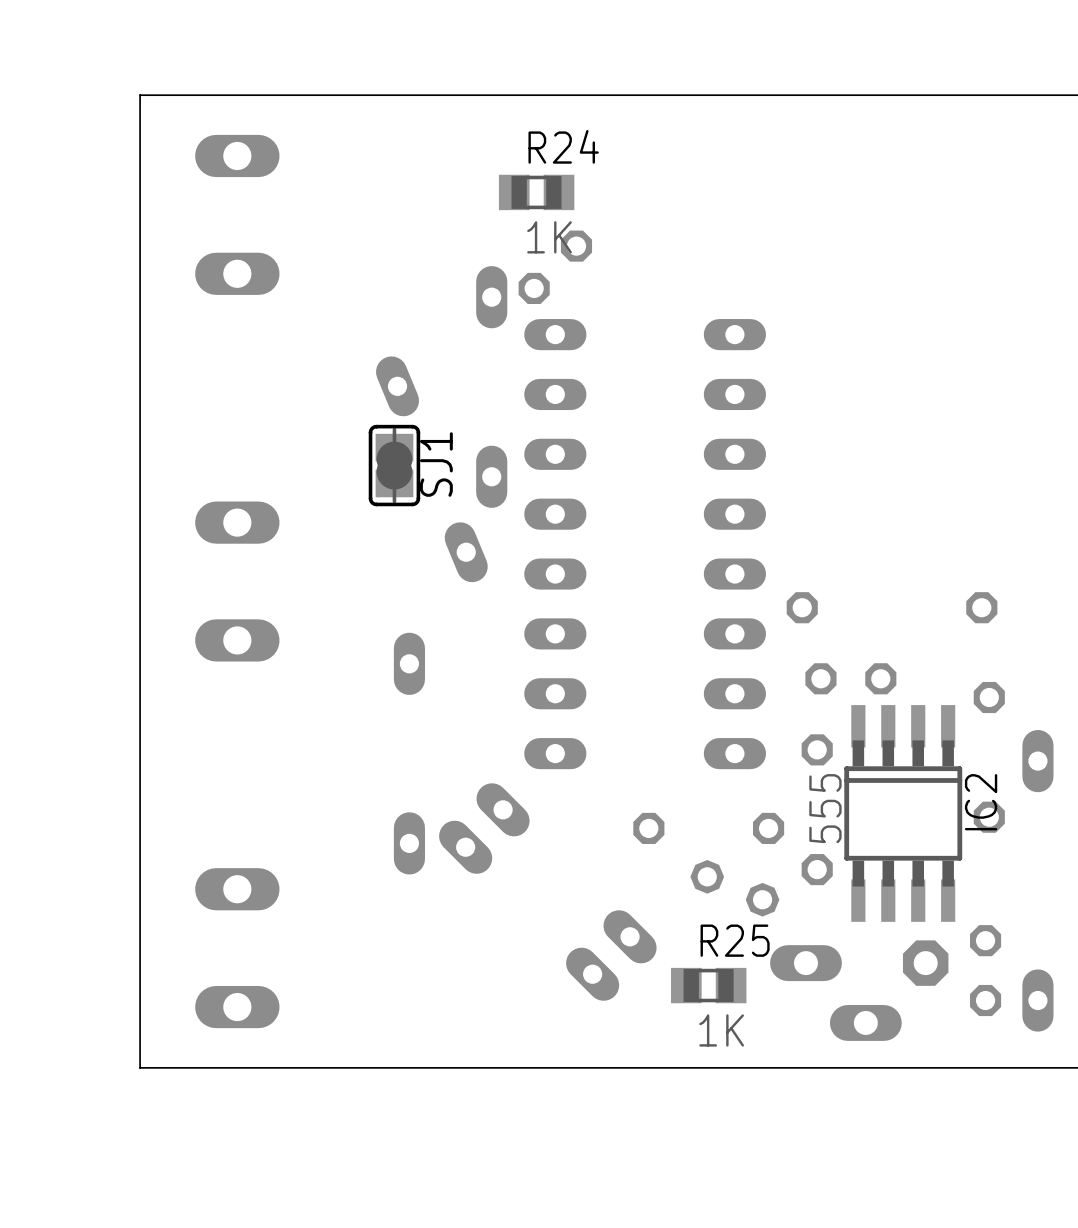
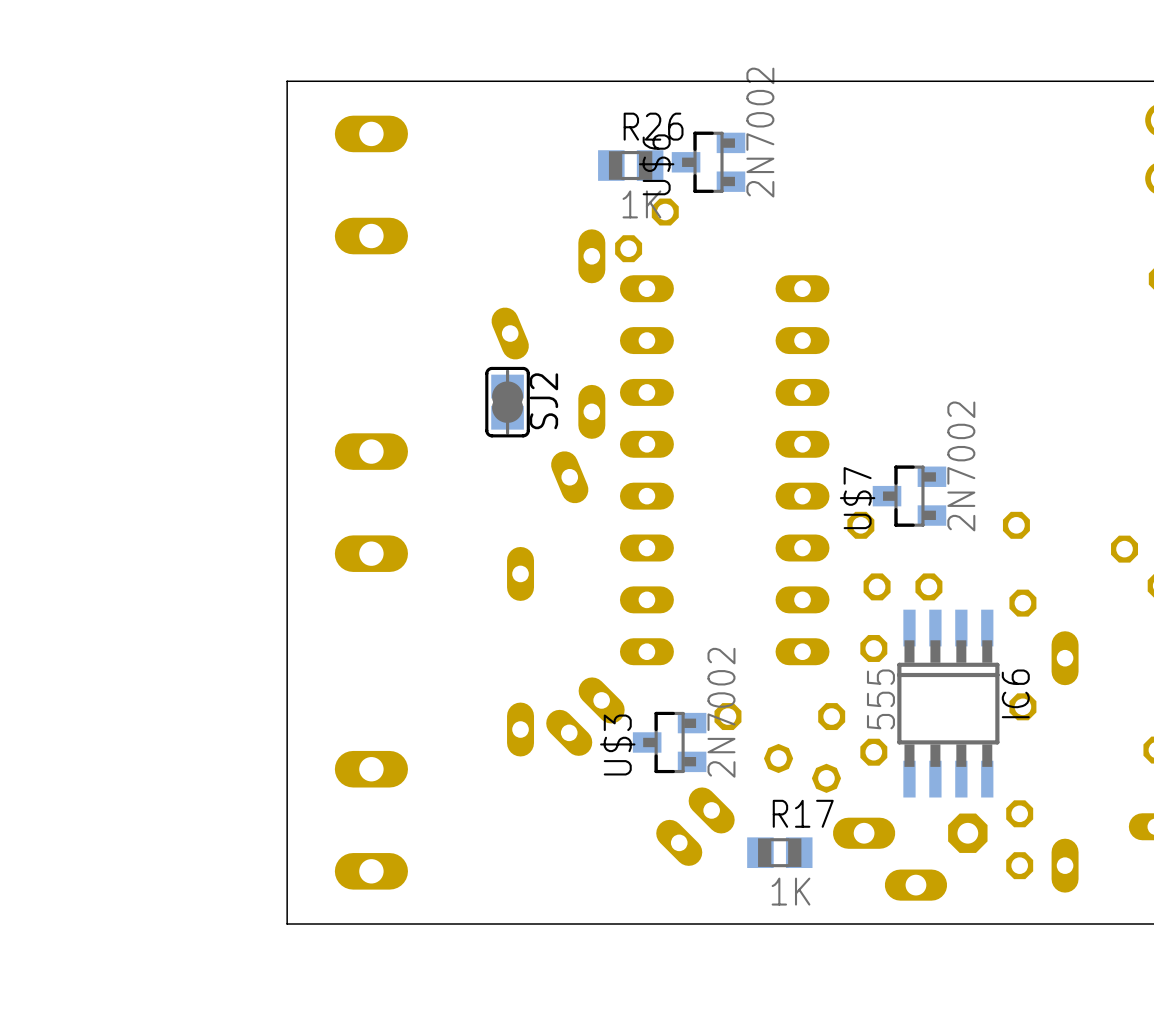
R24 name: R24 (563, 146) -> R26 (653, 126)
U$6: none -> 2N7002 (708, 162)
SJ1 name: SJ1 (436, 464) -> SJ2 (543, 401)
U$7: none -> 2N7002 (909, 496)
IC2 name: IC2 (981, 802) -> IC6 (1015, 693)
U$3: none -> 2N7002 (669, 742)
R25 name: R25 (735, 940) -> R17 (803, 813)

